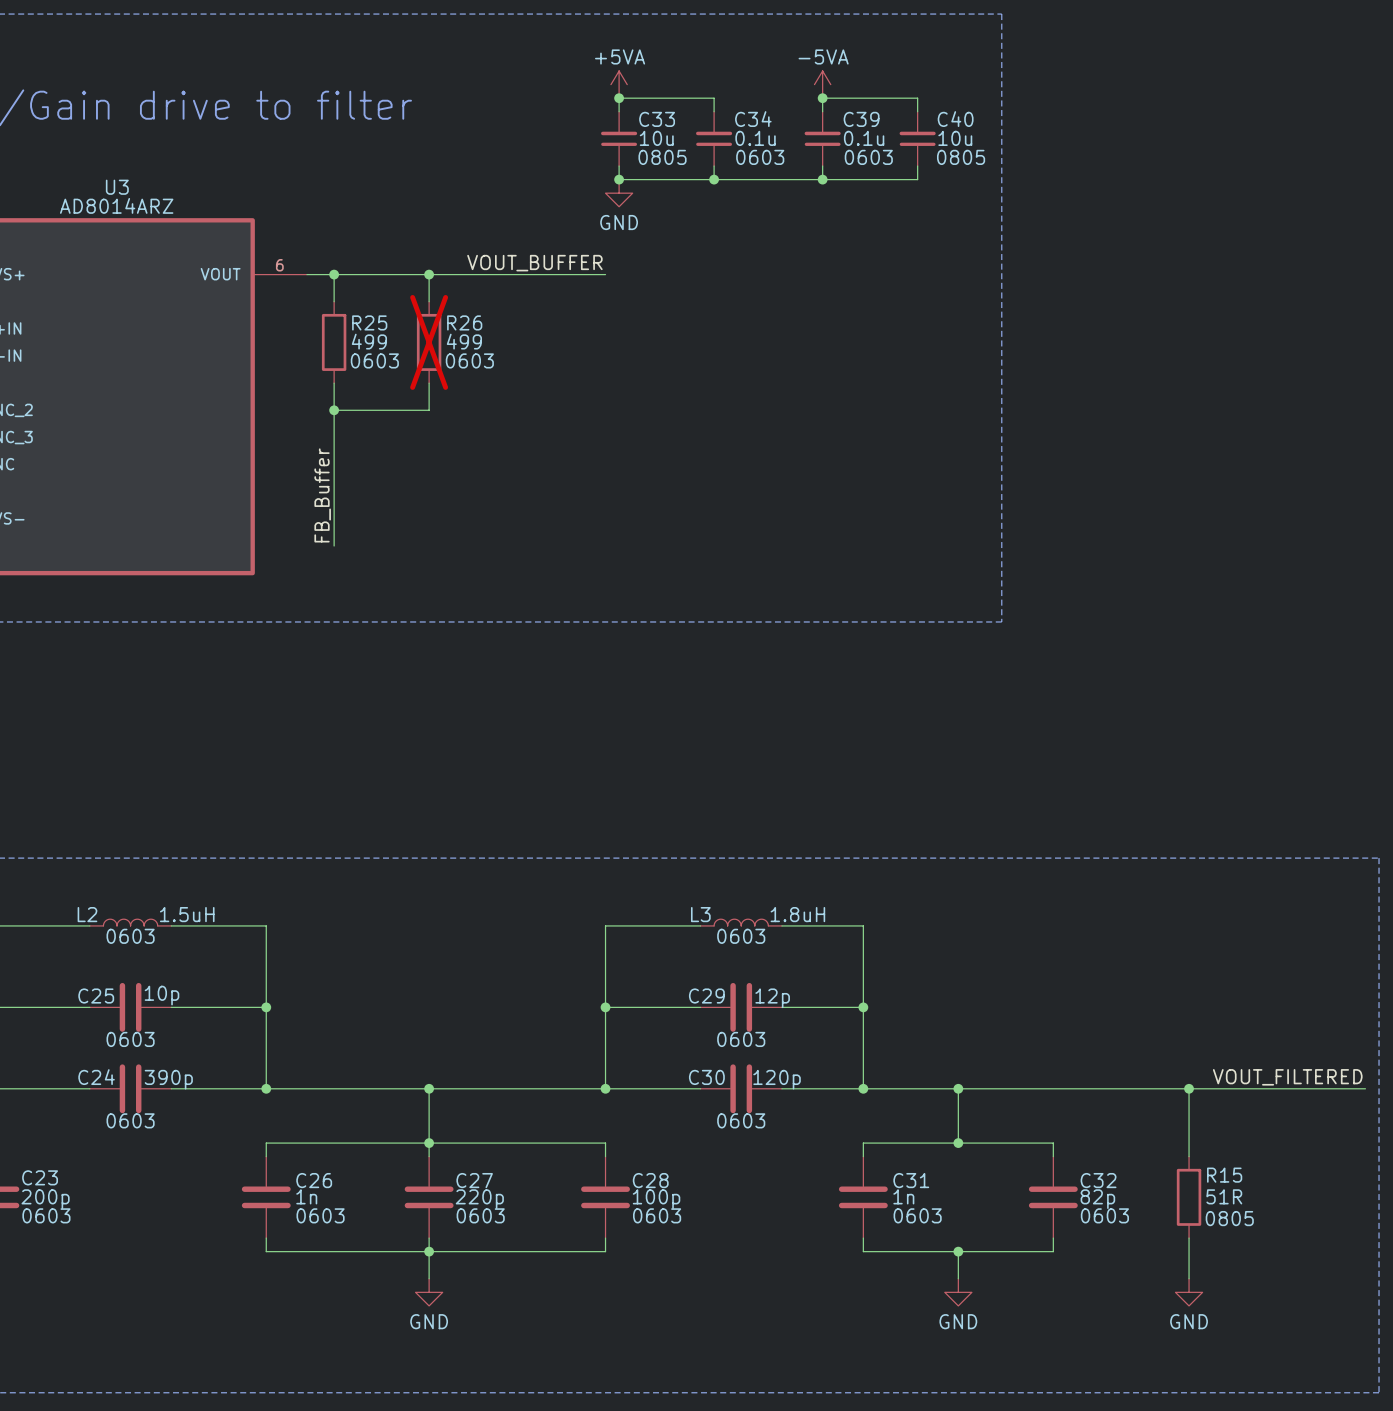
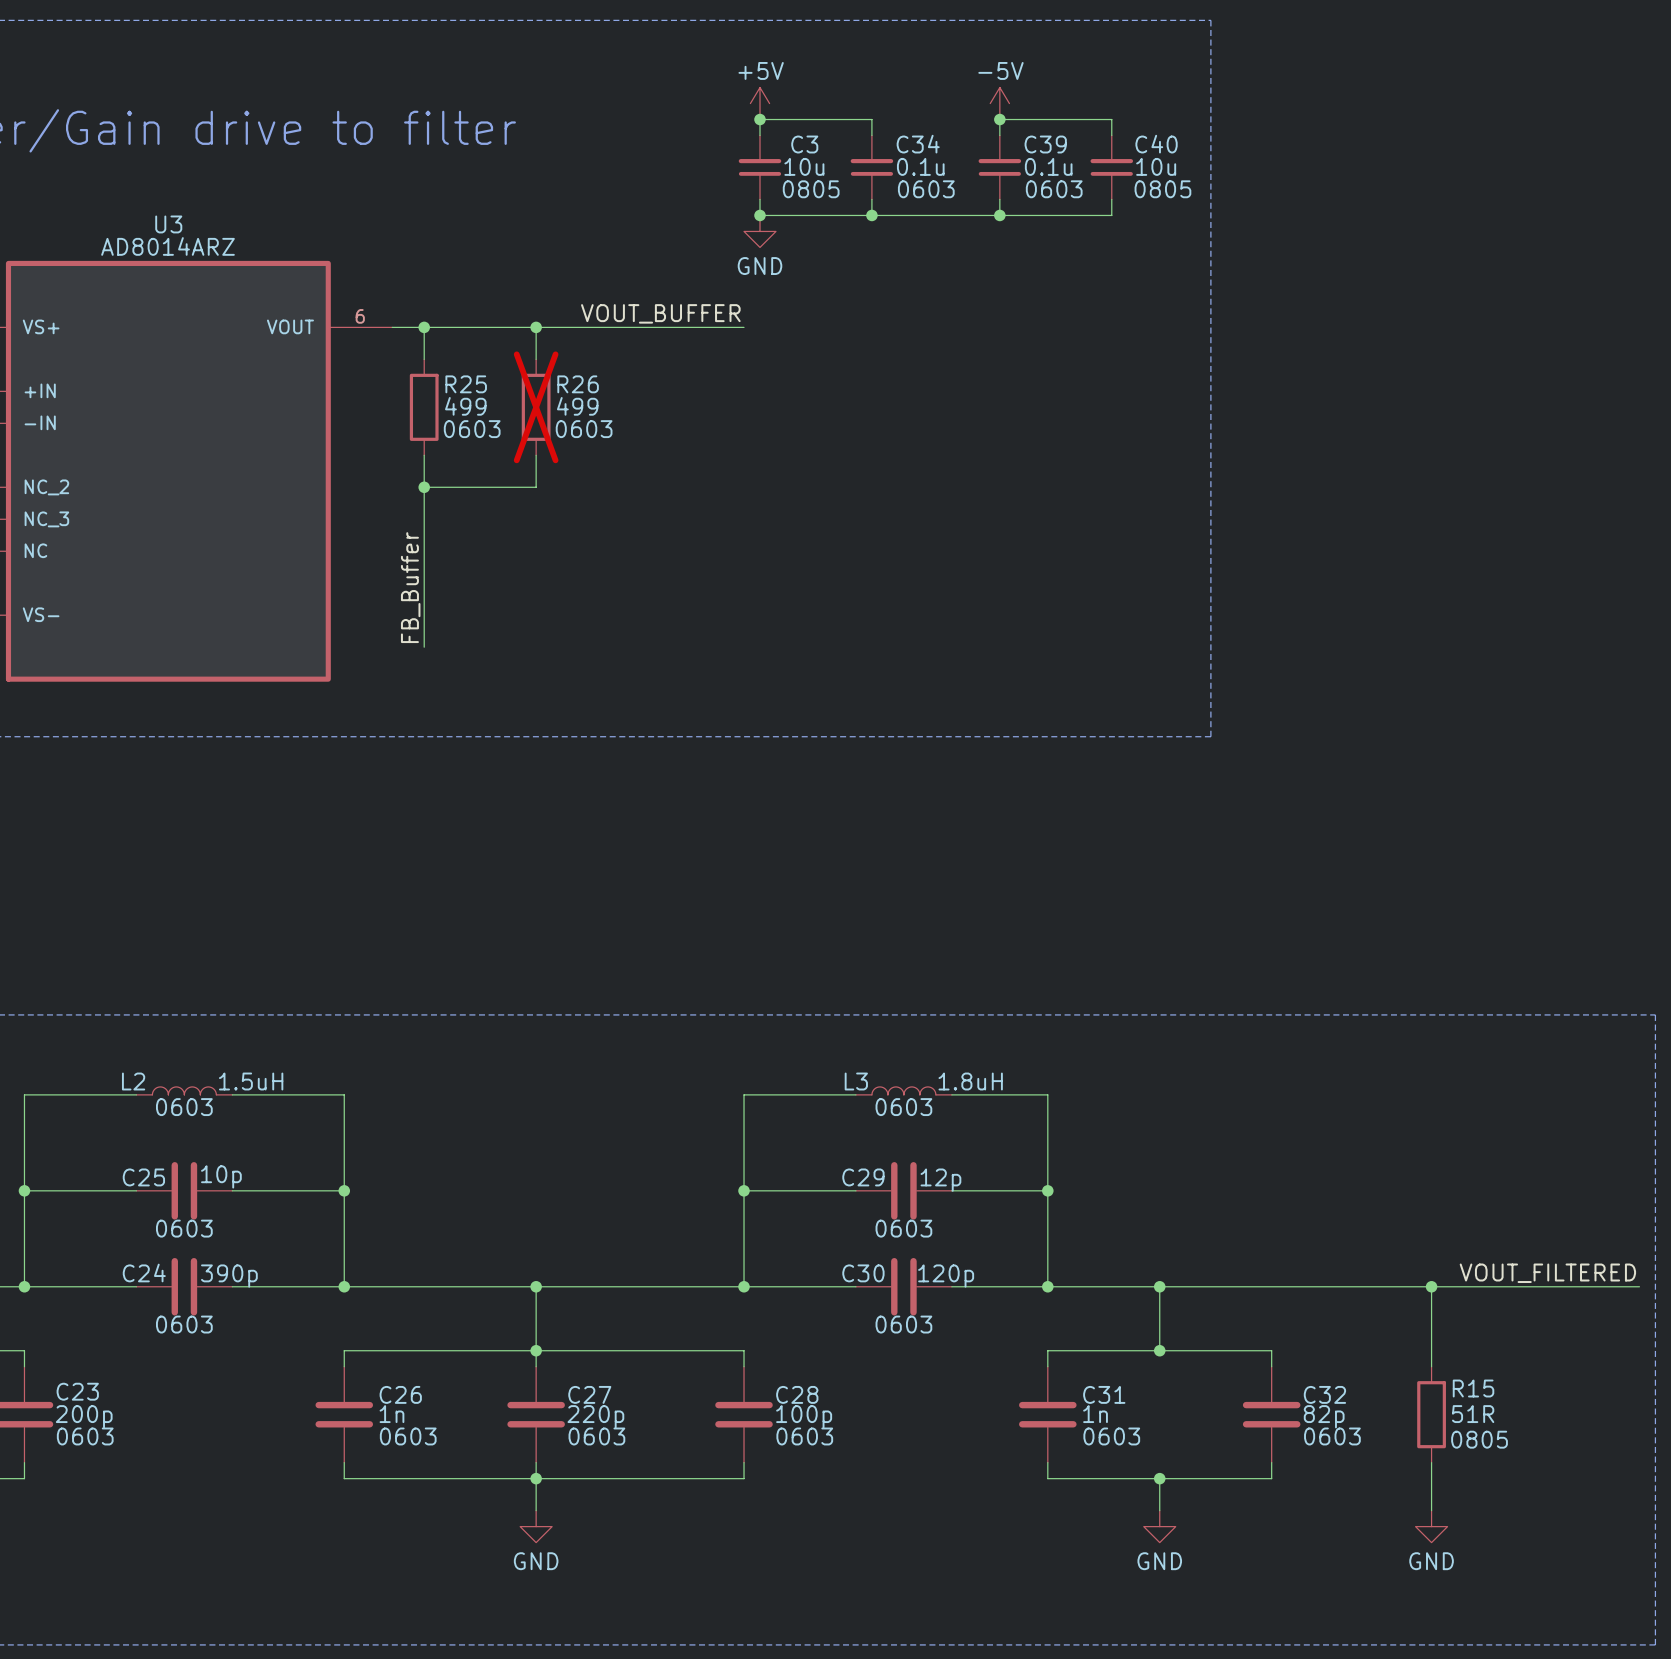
power symbol: +5VA (619, 84) -> +5V (760, 103)
power symbol: -5VA (822, 84) -> -5V (999, 103)
C33 name: C33 (657, 119) -> C3 (804, 144)

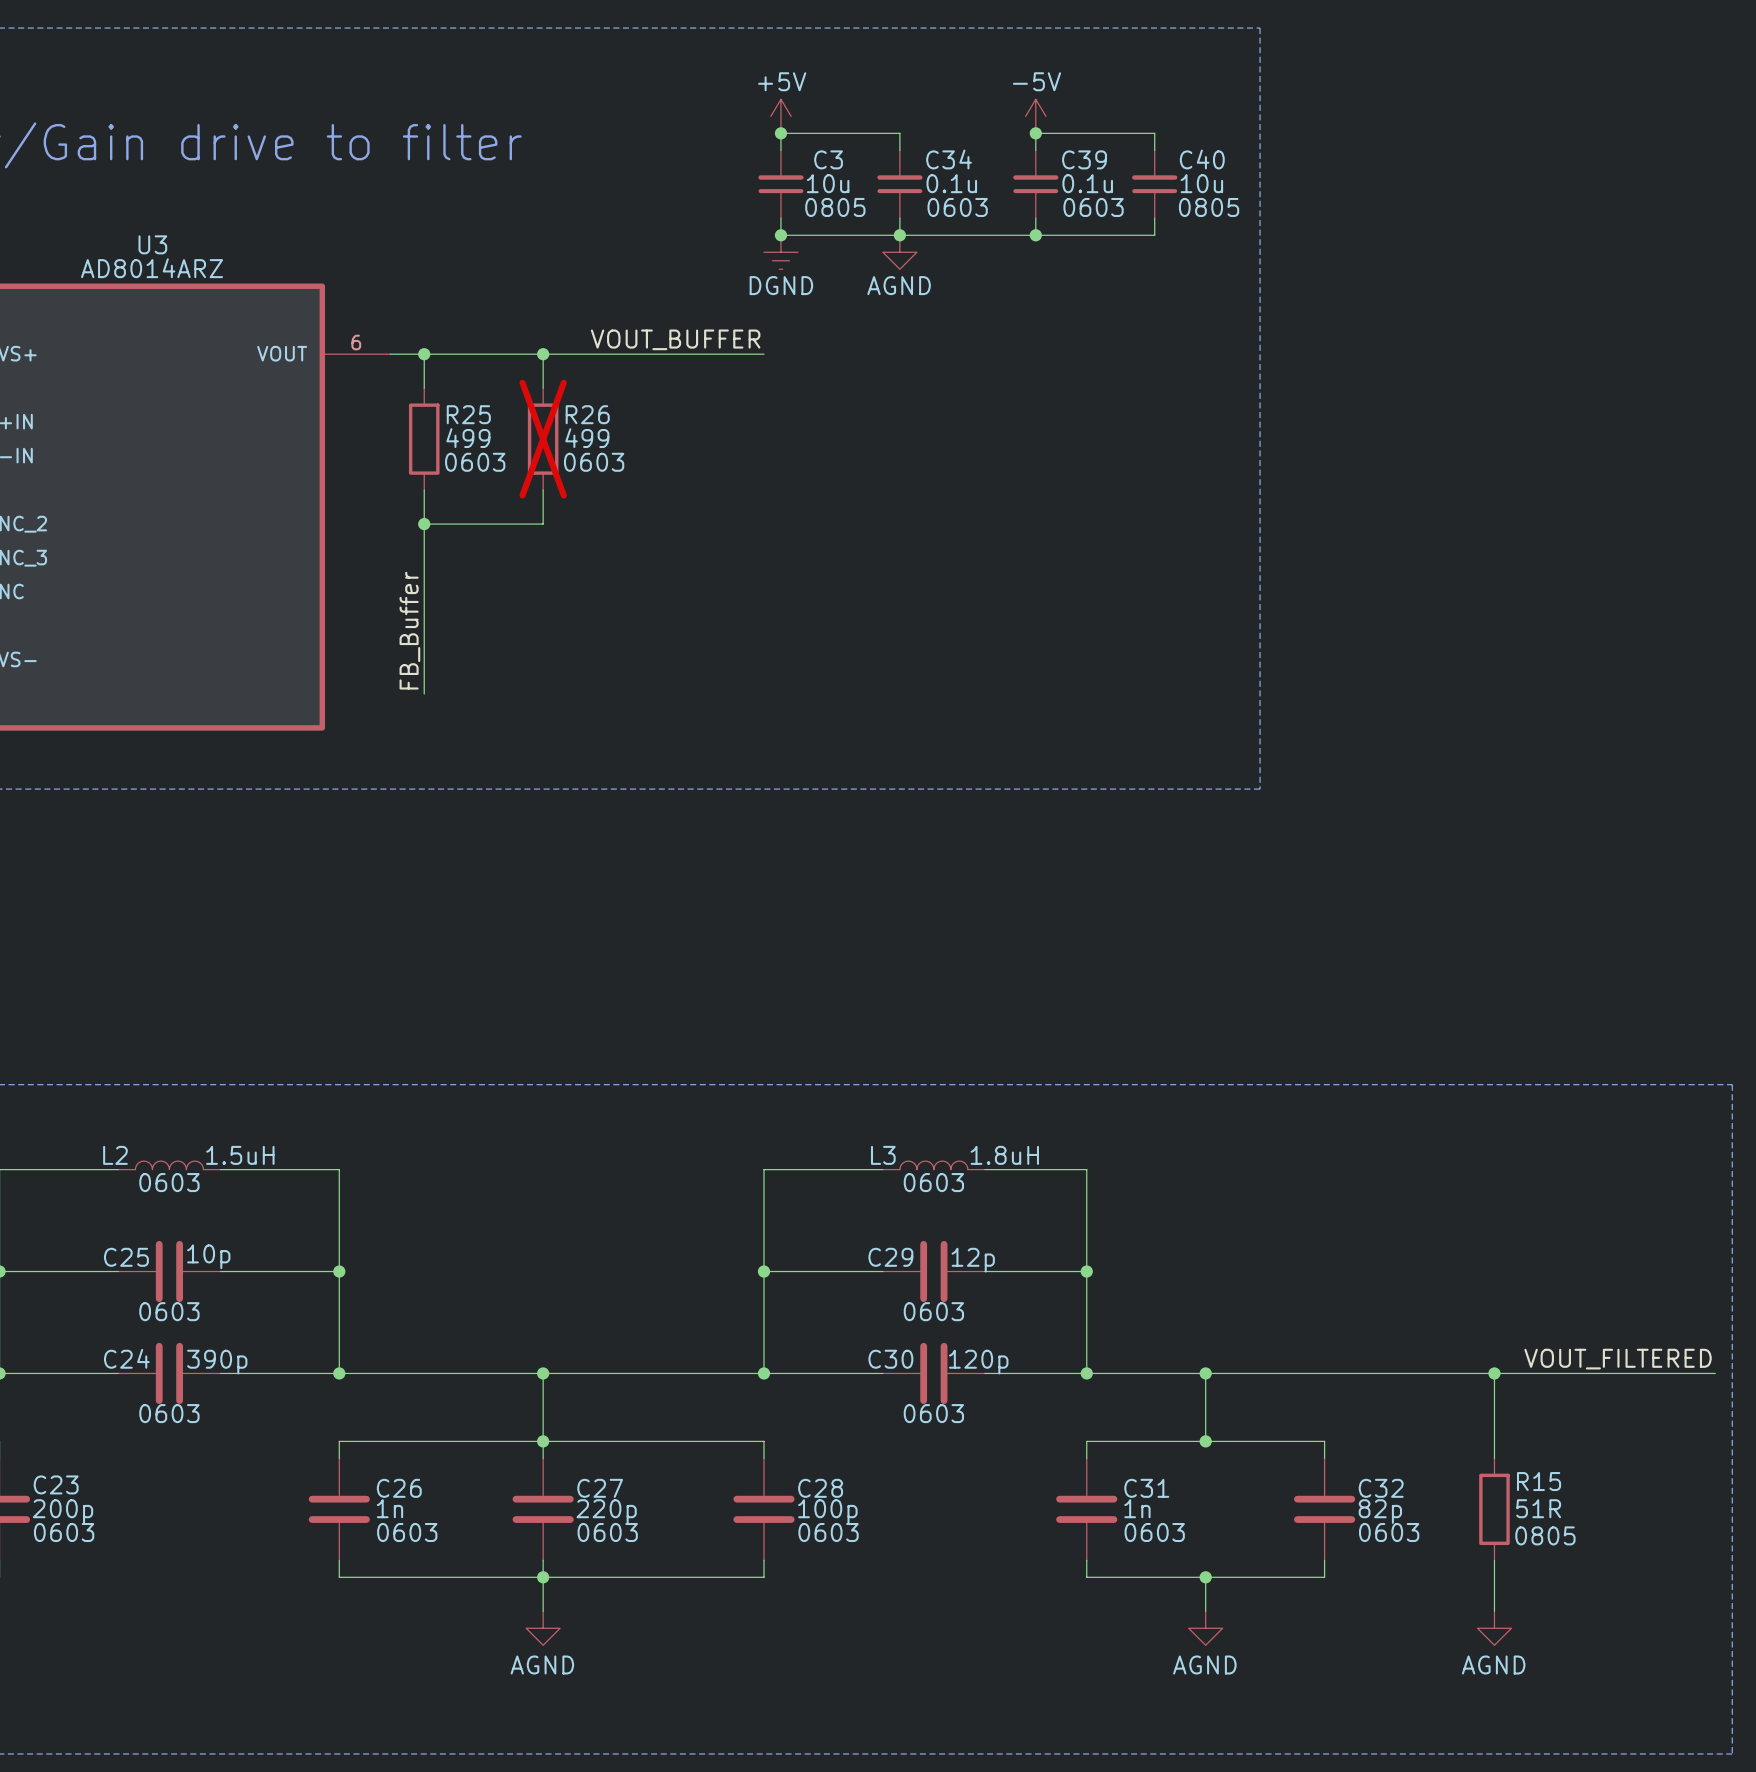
power symbol: GND (760, 231) -> DGND (780, 252)
power symbol: none -> AGND (899, 252)
power symbol: GND (536, 1526) -> AGND (543, 1628)
power symbol: GND (1159, 1526) -> AGND (1205, 1628)
power symbol: GND (1431, 1526) -> AGND (1494, 1628)

